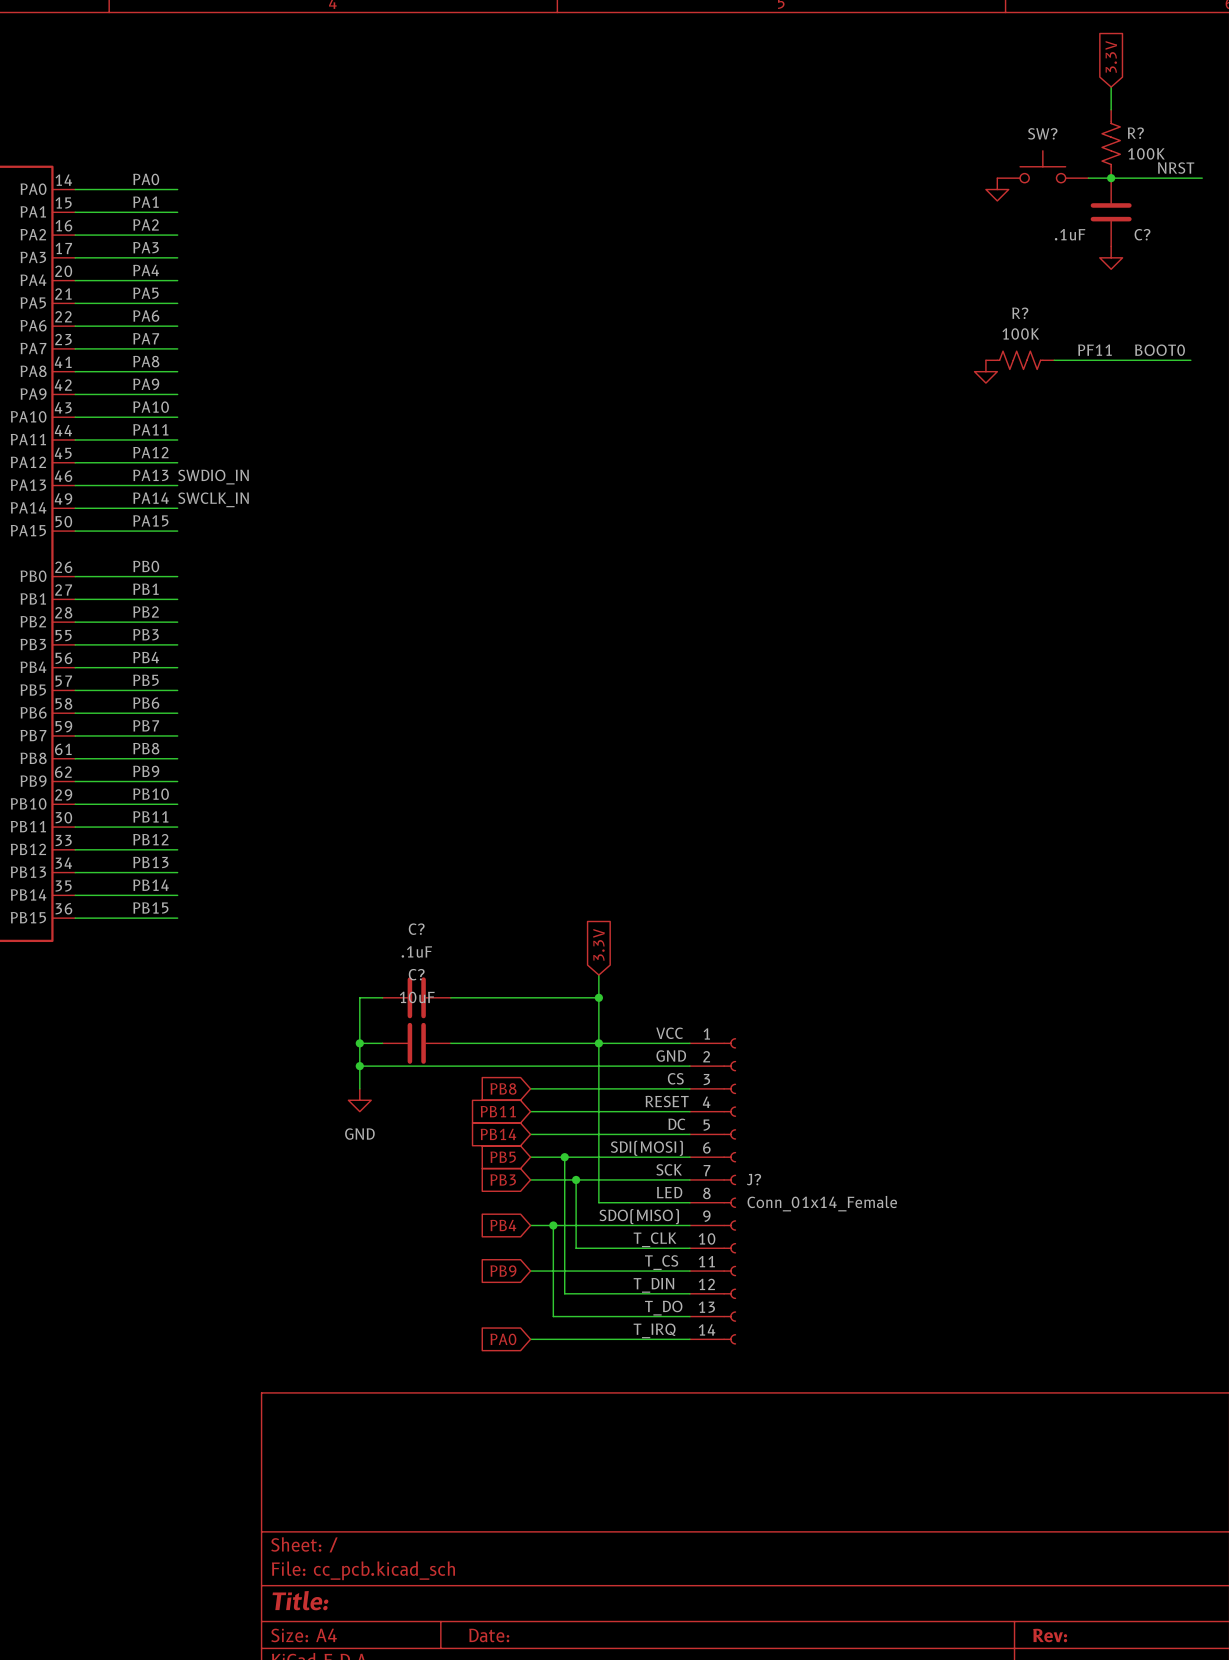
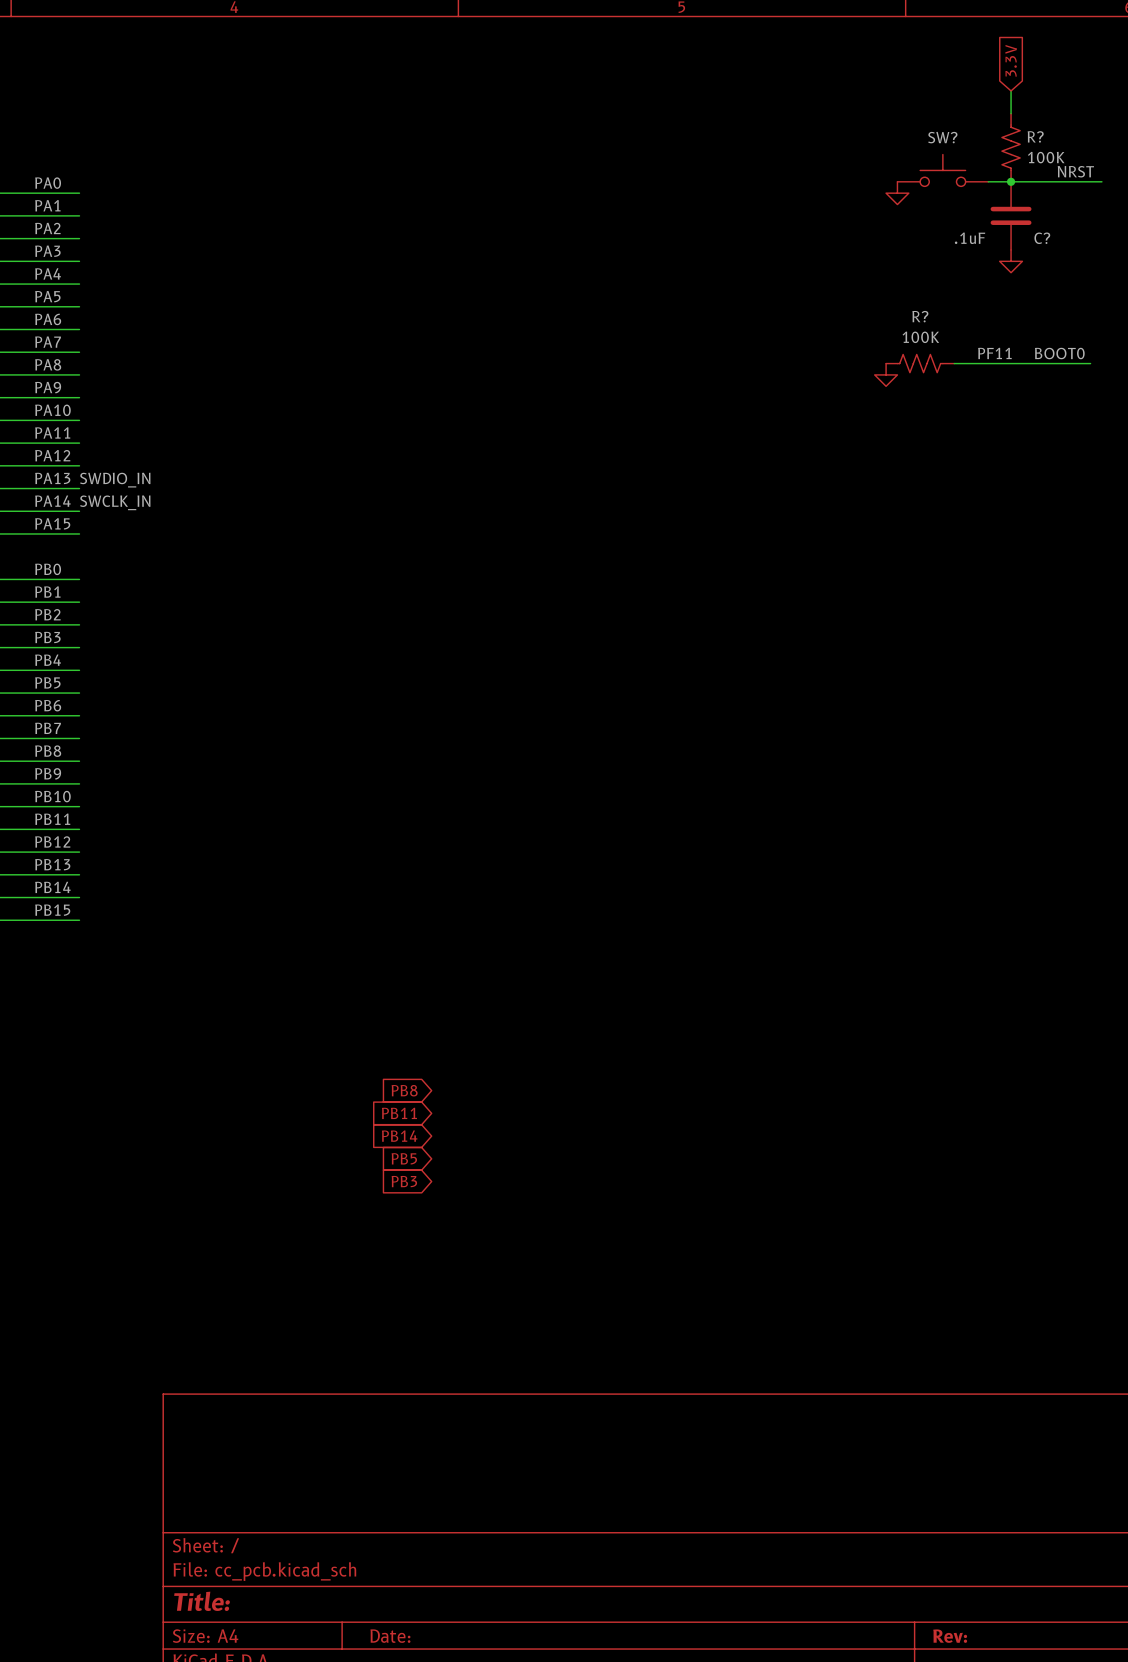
global label: 3.3V (598, 944) -> none
wire: (598, 975) (598, 1202) (689, 1202) -> none
wire: (382, 997) (359, 997) (359, 1088) -> none
C?: .1uF (416, 997) -> none
wire: (450, 997) (598, 997) -> none
junction: (598, 997) -> none
label: VCC (669, 1033) -> none
wire: (359, 1043) (382, 1043) -> none
junction: (359, 1043) -> none
C?: 10uF (416, 1043) -> none
wire: (450, 1043) (689, 1043) -> none
junction: (598, 1043) -> none
label: GND (671, 1056) -> none
wire: (359, 1066) (689, 1066) -> none
junction: (359, 1066) -> none
label: CS (675, 1078) -> none
wire: (530, 1088) (689, 1088) -> none
power symbol: GND (359, 1100) -> none
label: RESET (667, 1101) -> none
wire: (530, 1111) (689, 1111) -> none
label: DC (676, 1124) -> none
wire: (530, 1134) (689, 1134) -> none
label: SDI(MOSI) (646, 1148) -> none
wire: (530, 1157) (689, 1157) -> none
wire: (564, 1157) (564, 1293) (689, 1293) -> none
junction: (564, 1157) -> none
label: SCK (669, 1169) -> none
wire: (530, 1179) (689, 1179) -> none
wire: (576, 1179) (576, 1248) (689, 1248) -> none
junction: (576, 1179) -> none
J?: Conn_01x14_Female (713, 1191) -> none
label: LED (669, 1192) -> none
label: SDO(MISO) (639, 1216) -> none
global label: PB4 (503, 1225) -> none
wire: (530, 1225) (689, 1225) -> none
wire: (553, 1225) (553, 1316) (689, 1316) -> none
junction: (553, 1225) -> none
label: T_CLK (655, 1239) -> none
label: T_CS (661, 1262) -> none
global label: PB9 (503, 1271) -> none
wire: (530, 1271) (689, 1271) -> none
label: T_DIN (653, 1285) -> none
label: T_DO (663, 1308) -> none
label: T_IRQ (654, 1330) -> none
global label: PA0 (503, 1339) -> none
wire: (530, 1339) (689, 1339) -> none

